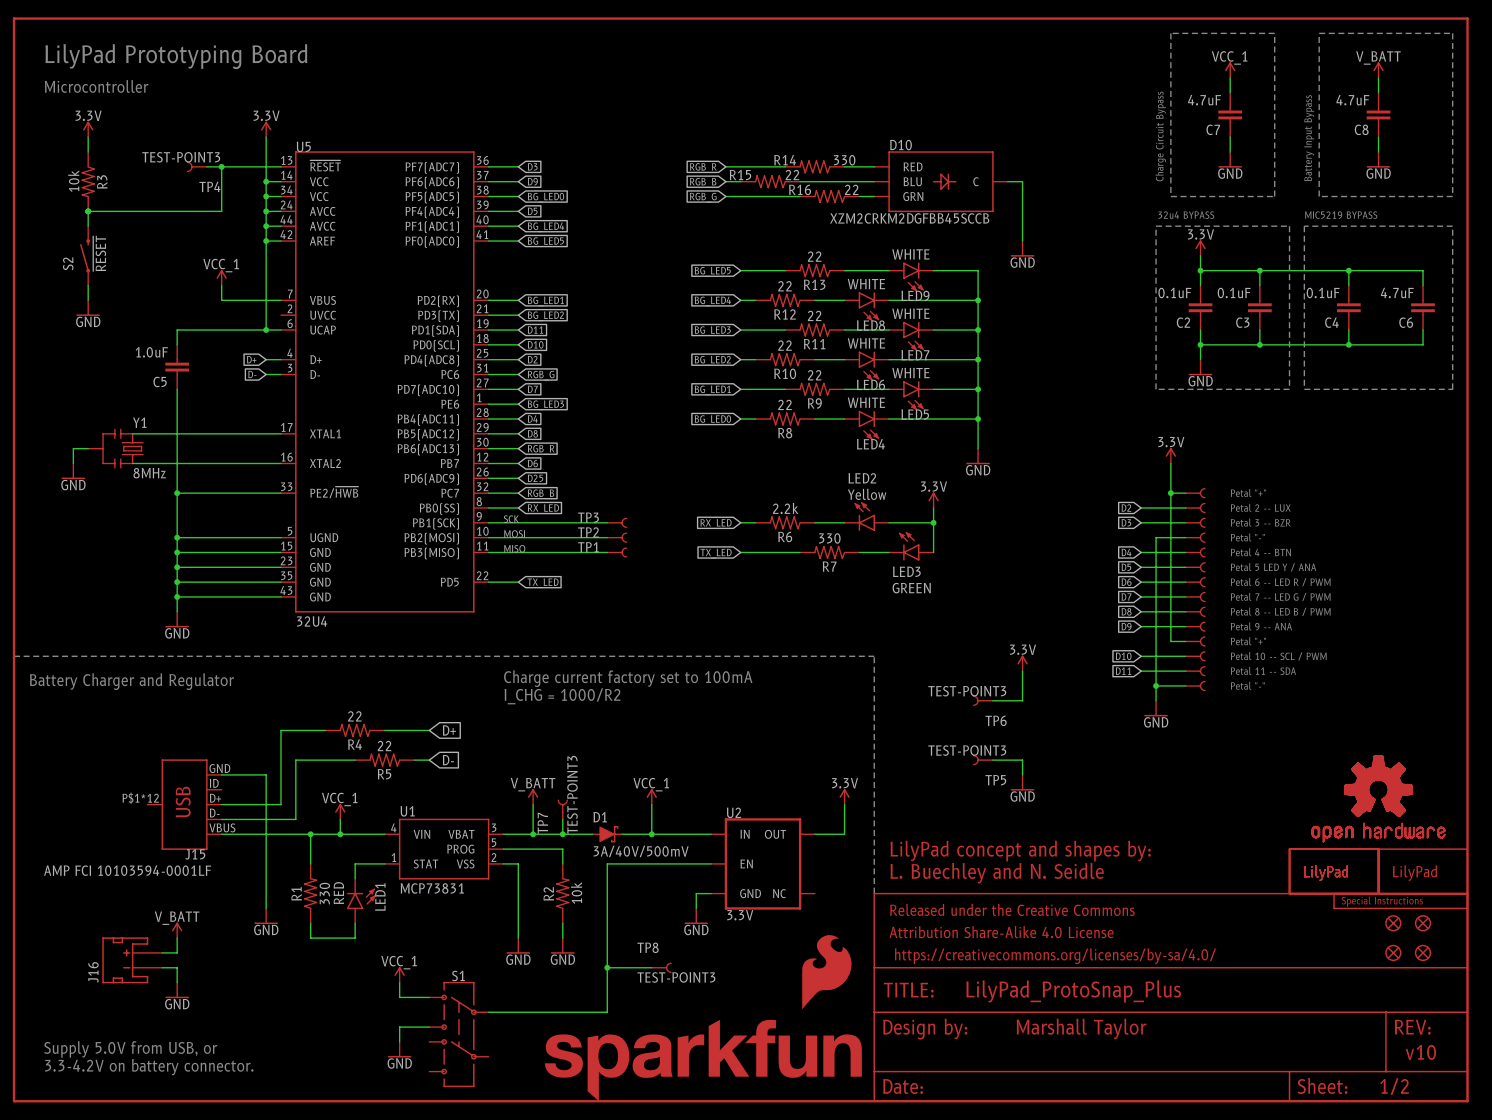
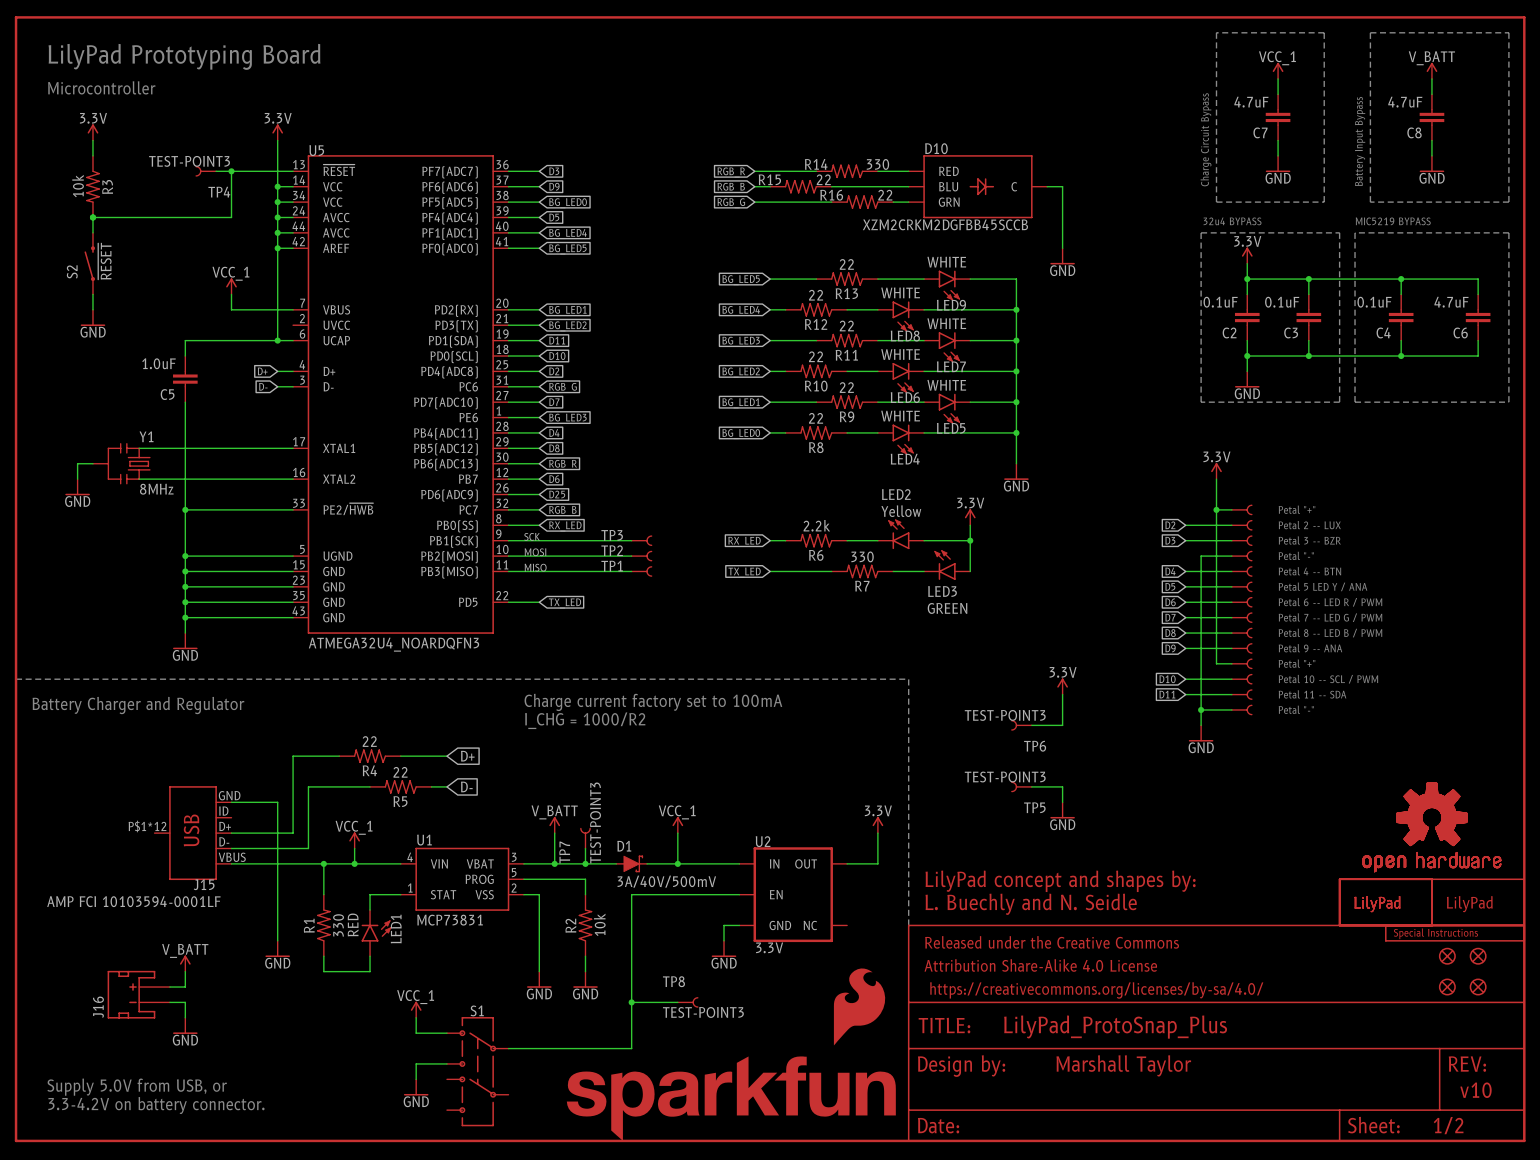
U5 value: 32U4 (312, 621) -> ATMEGA32U4_NOARDQFN3 (393, 644)
text: L. Buechley and N. Seidle (997, 873) -> L. Buechly and N. Seidle (1031, 904)

